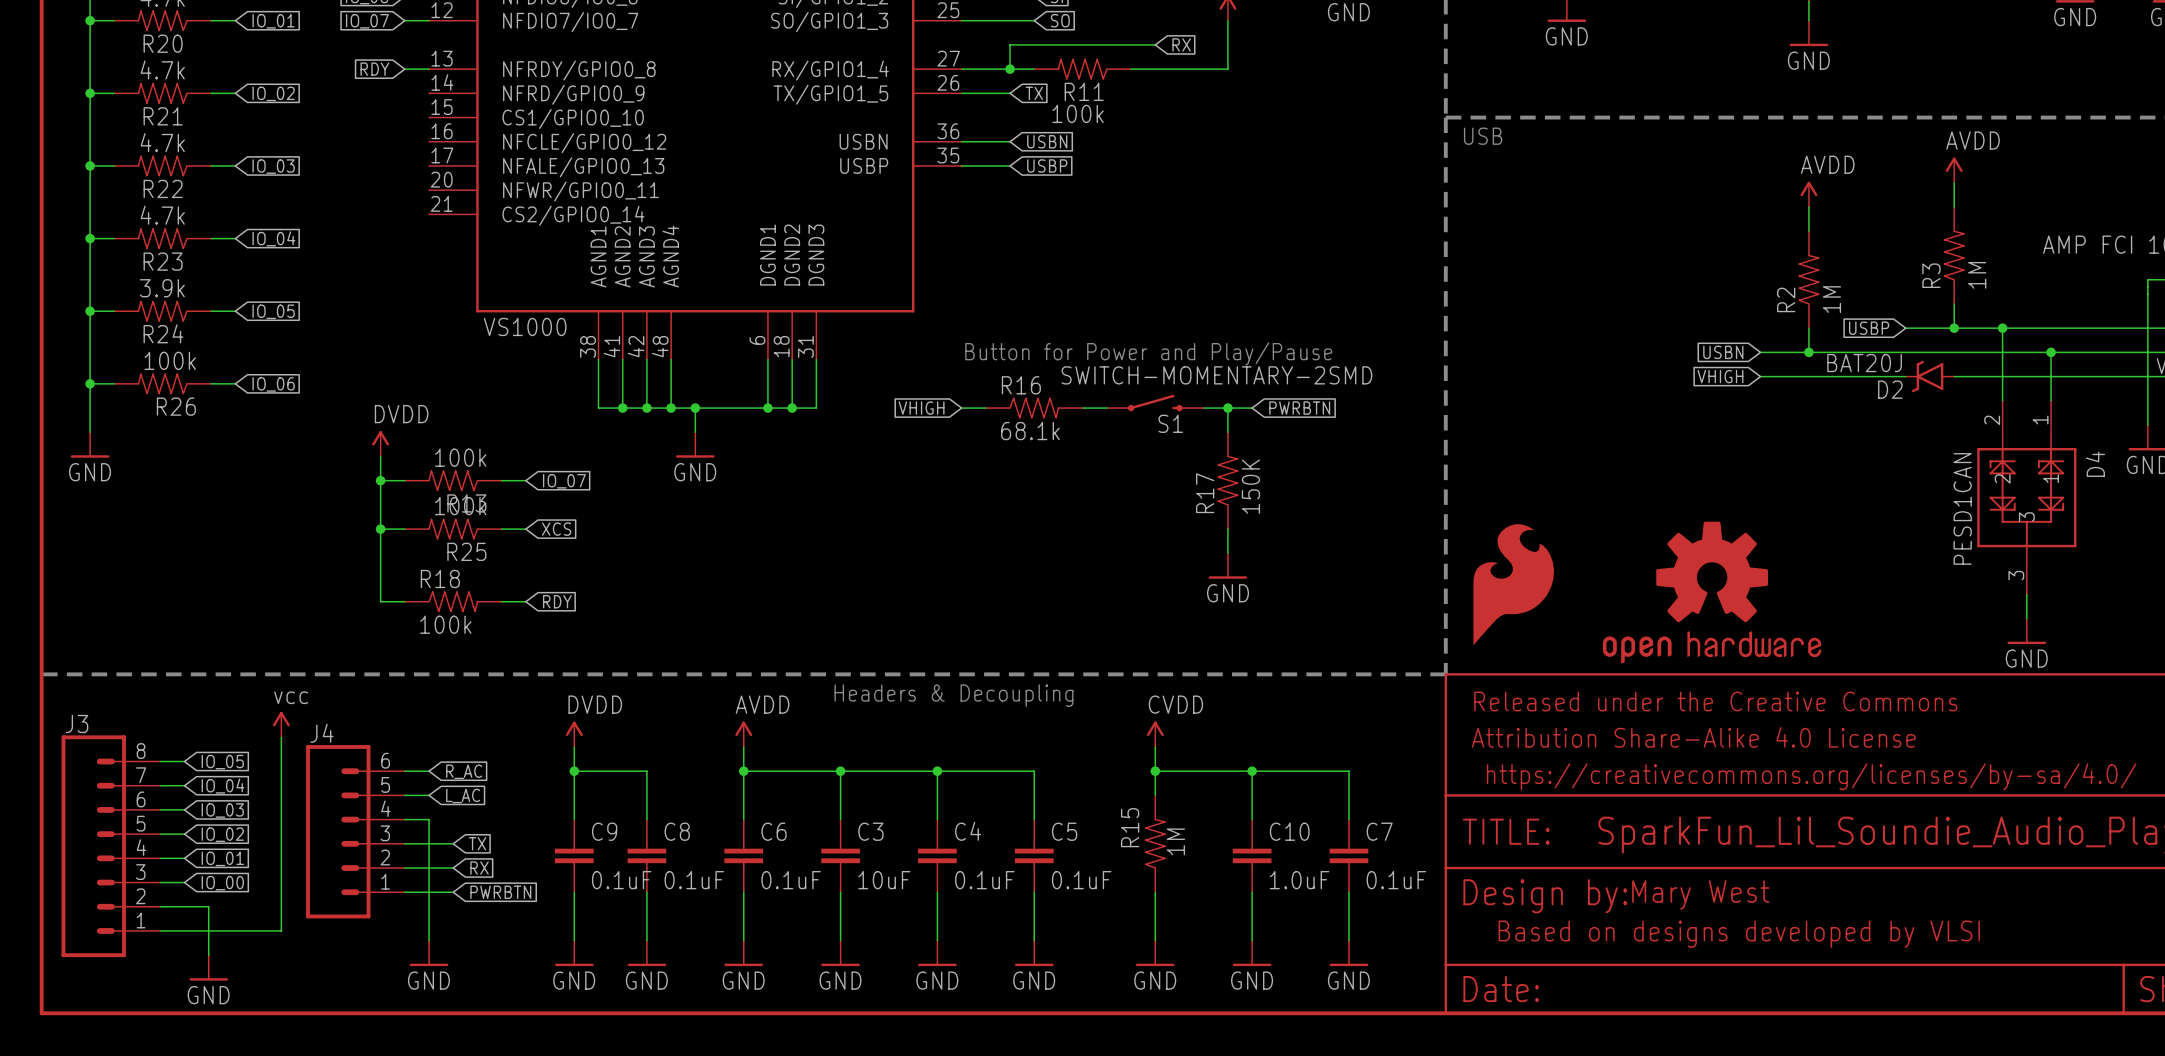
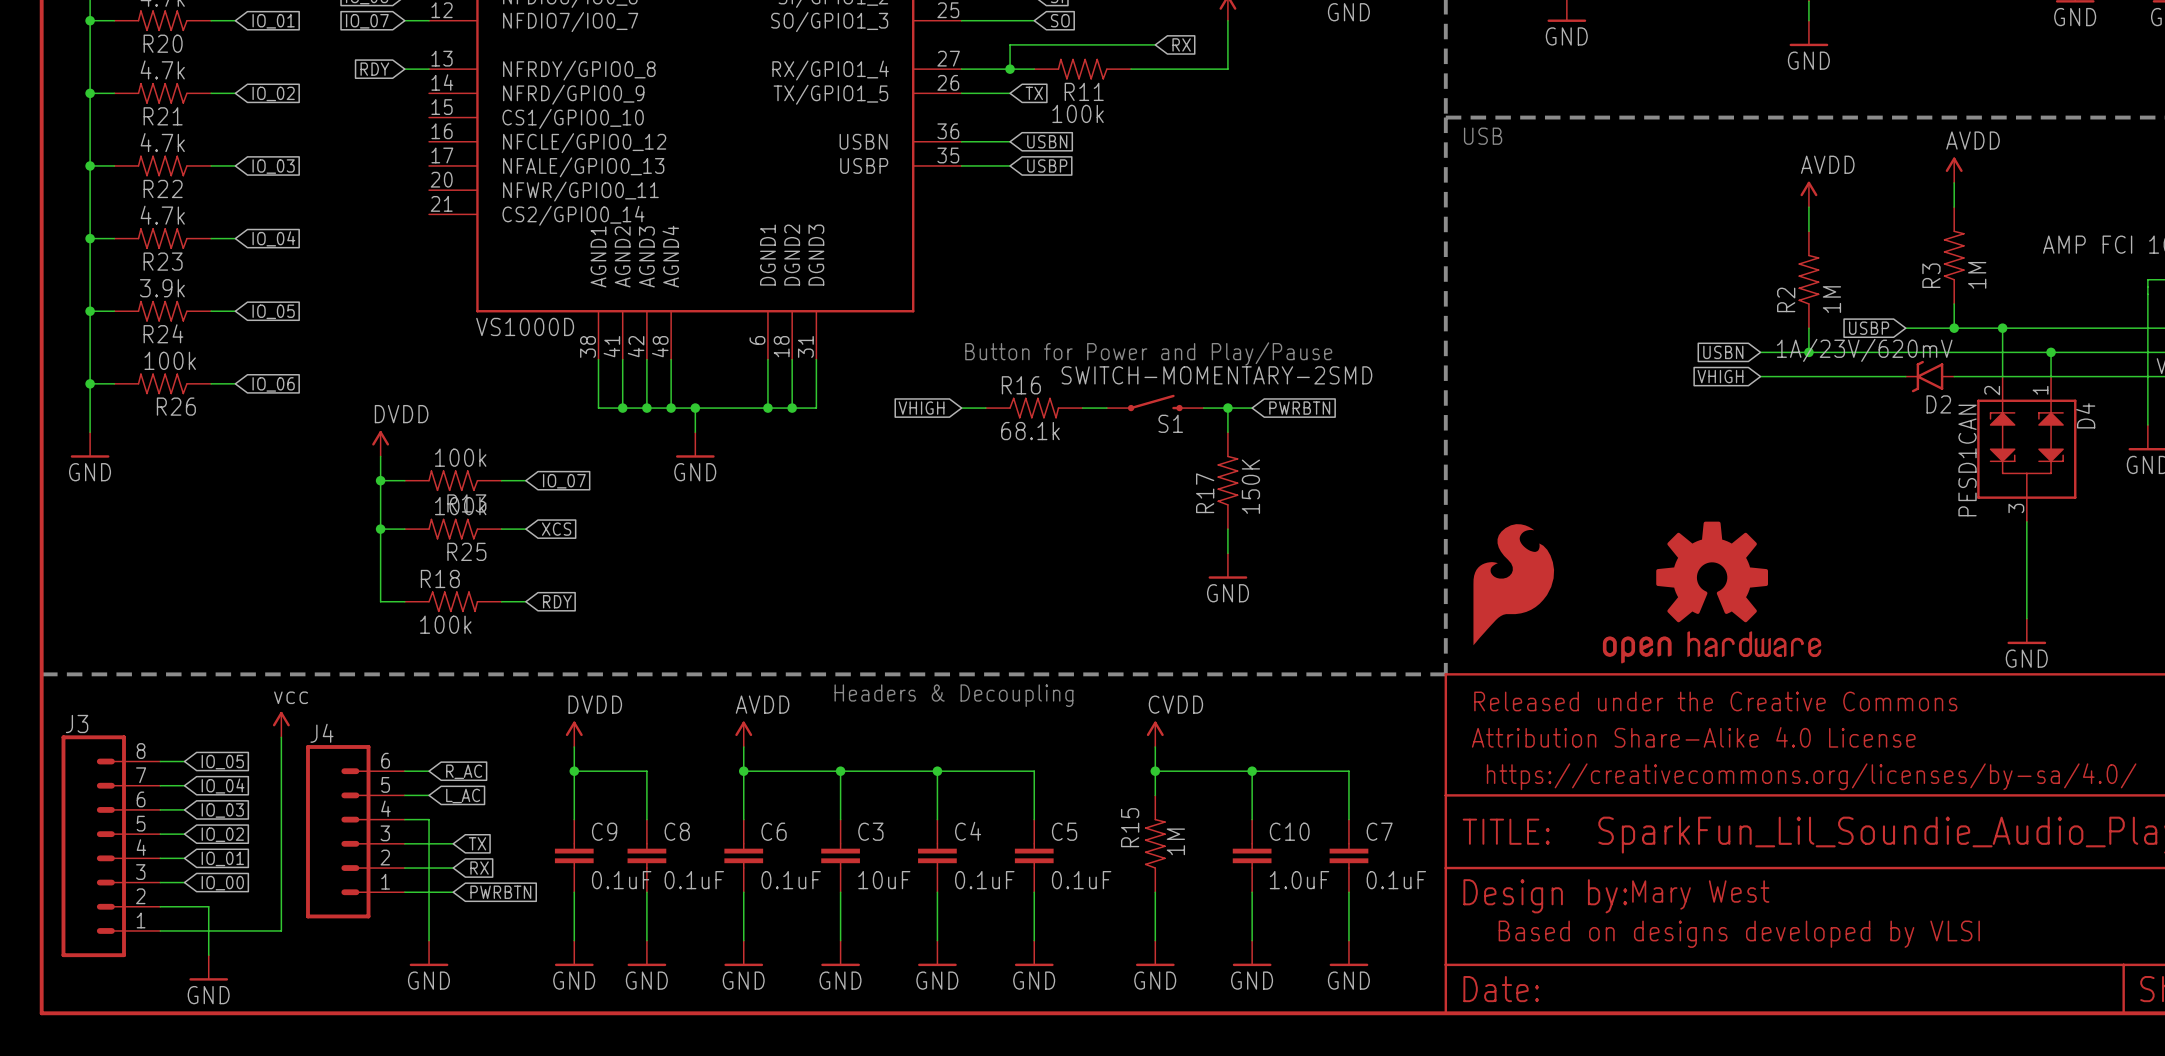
part value: VS1000 (525, 326) -> VS1000D (525, 326)
D2 value: BAT20J (1864, 363) -> 1A/23V/620mV (1864, 350)
D2 name position: D2 (1890, 389) -> D2 (1938, 404)
D4 symbol: [1977, 400, 2077, 595] -> [1977, 376, 2077, 522]

